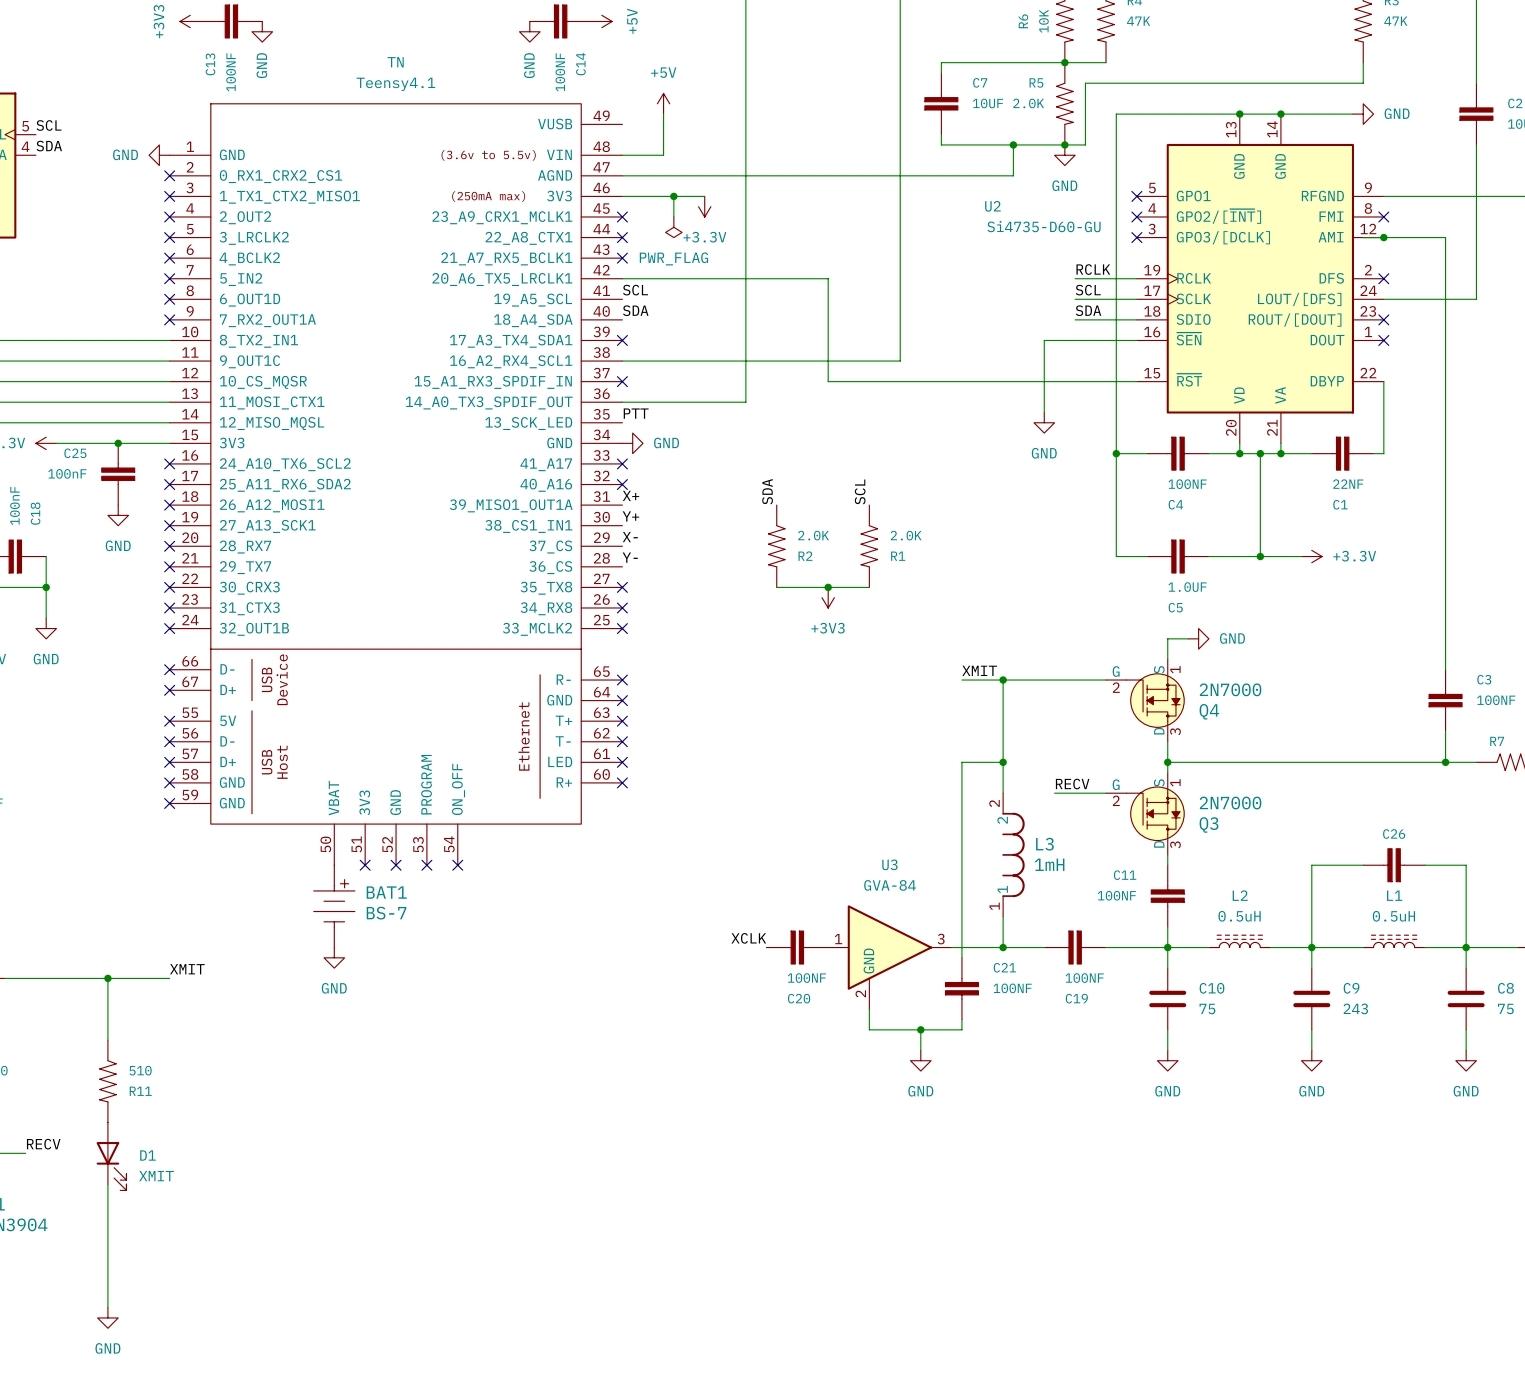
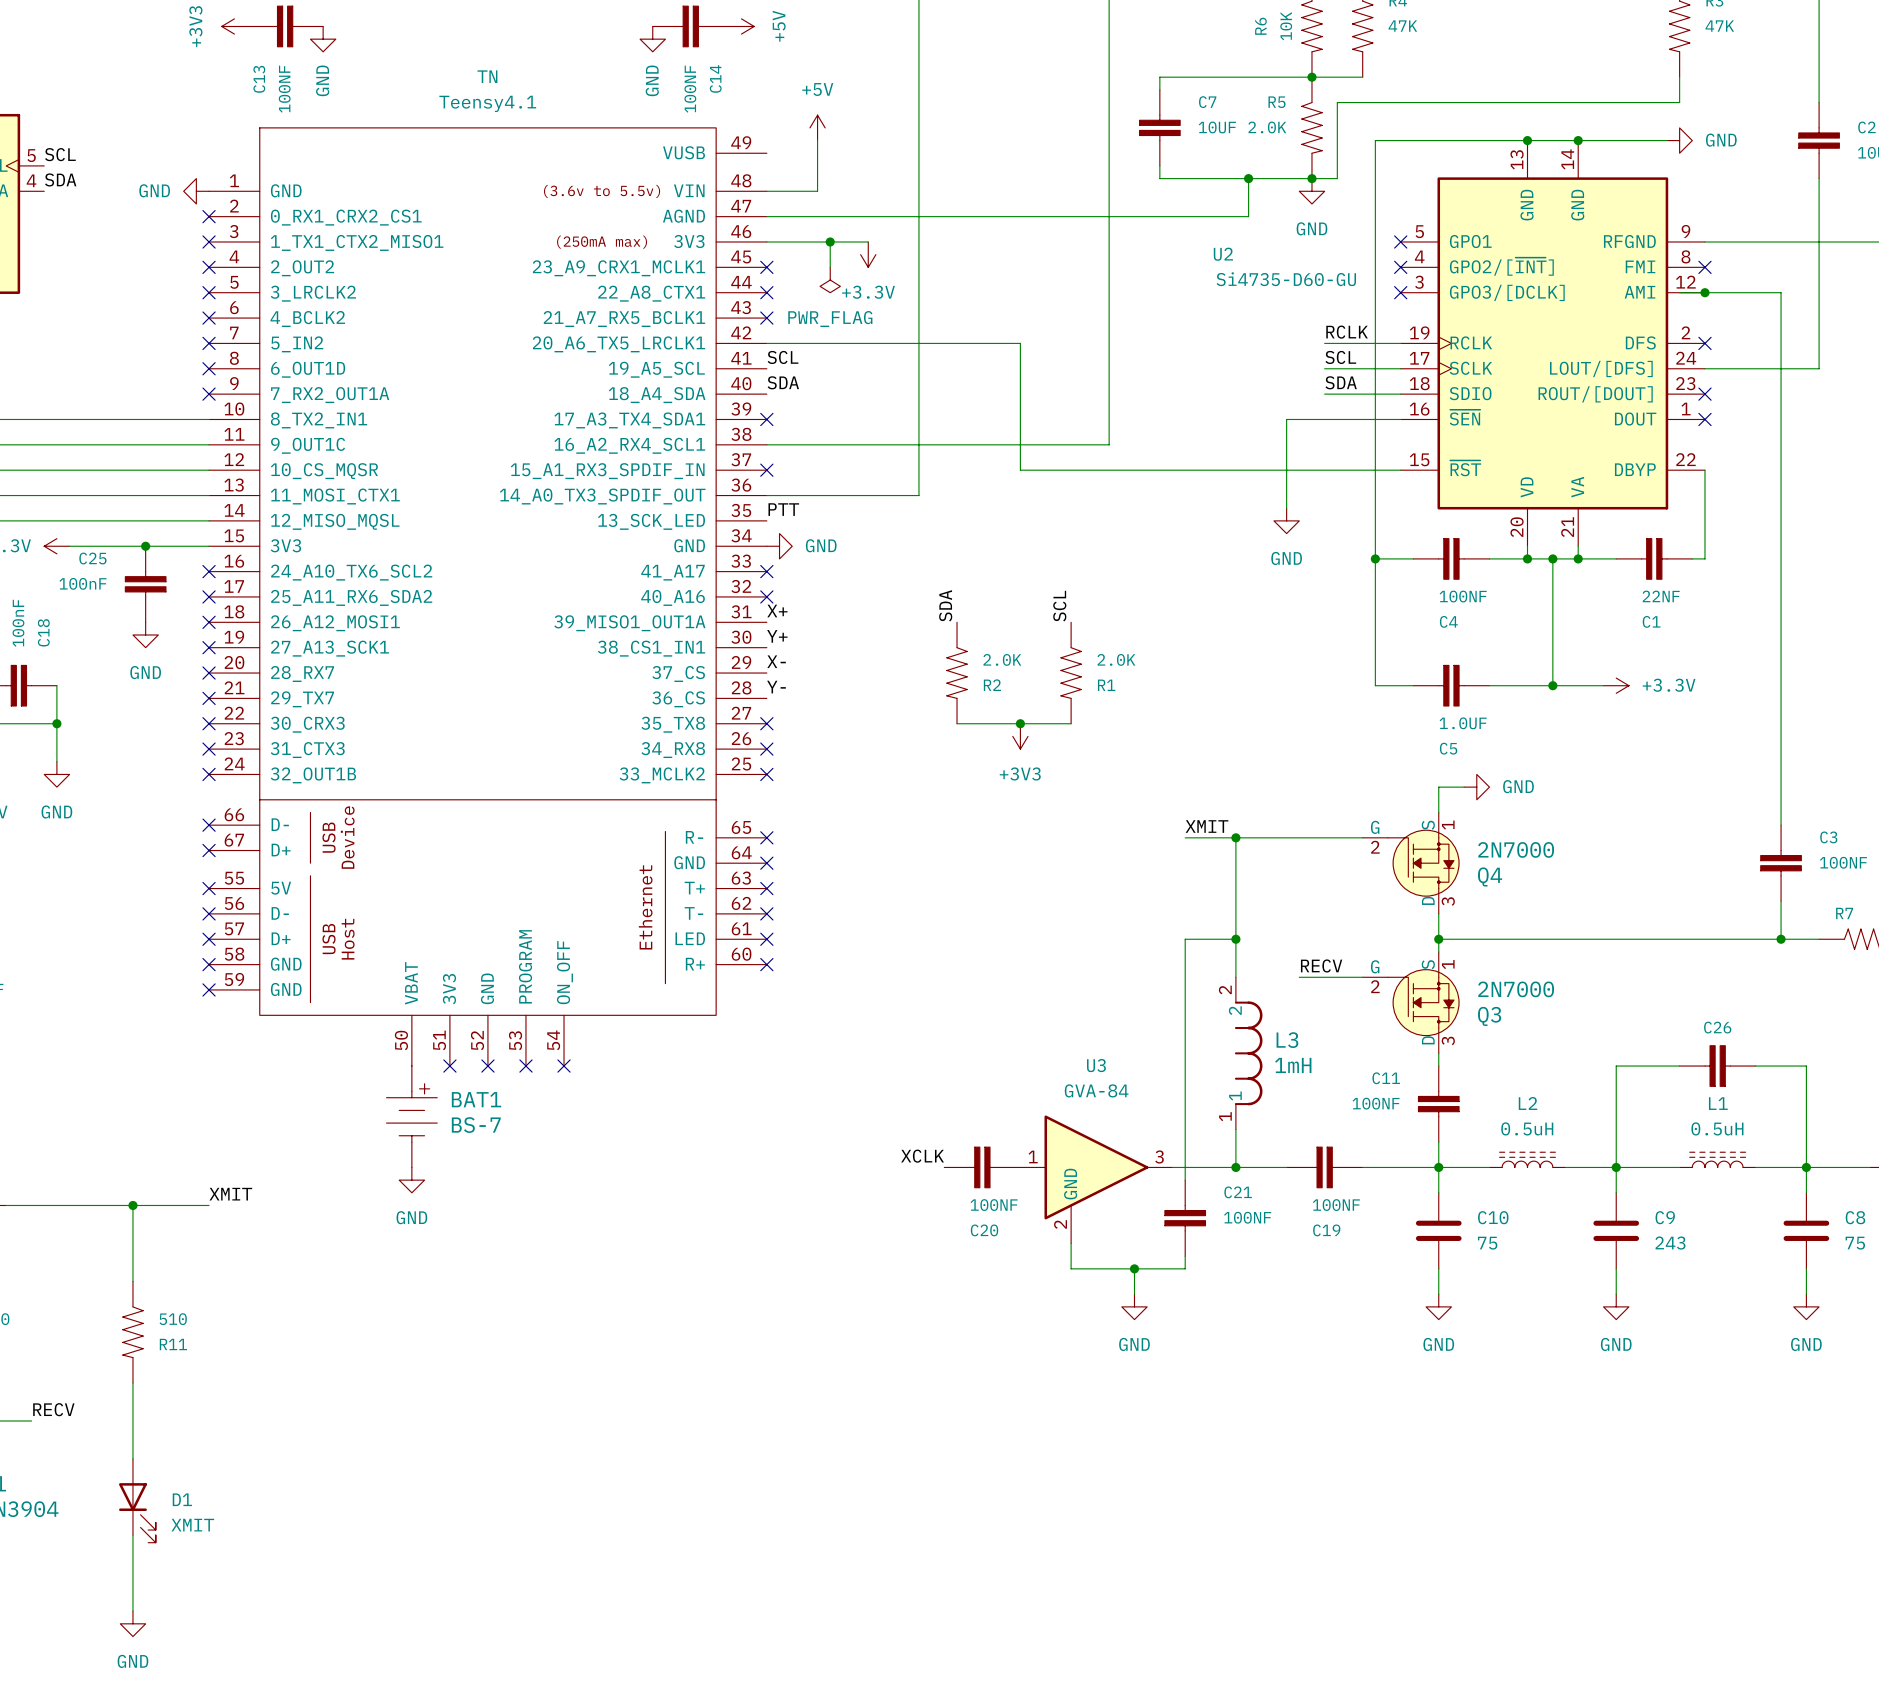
D1 position: (111, 1156) -> (137, 1500)

